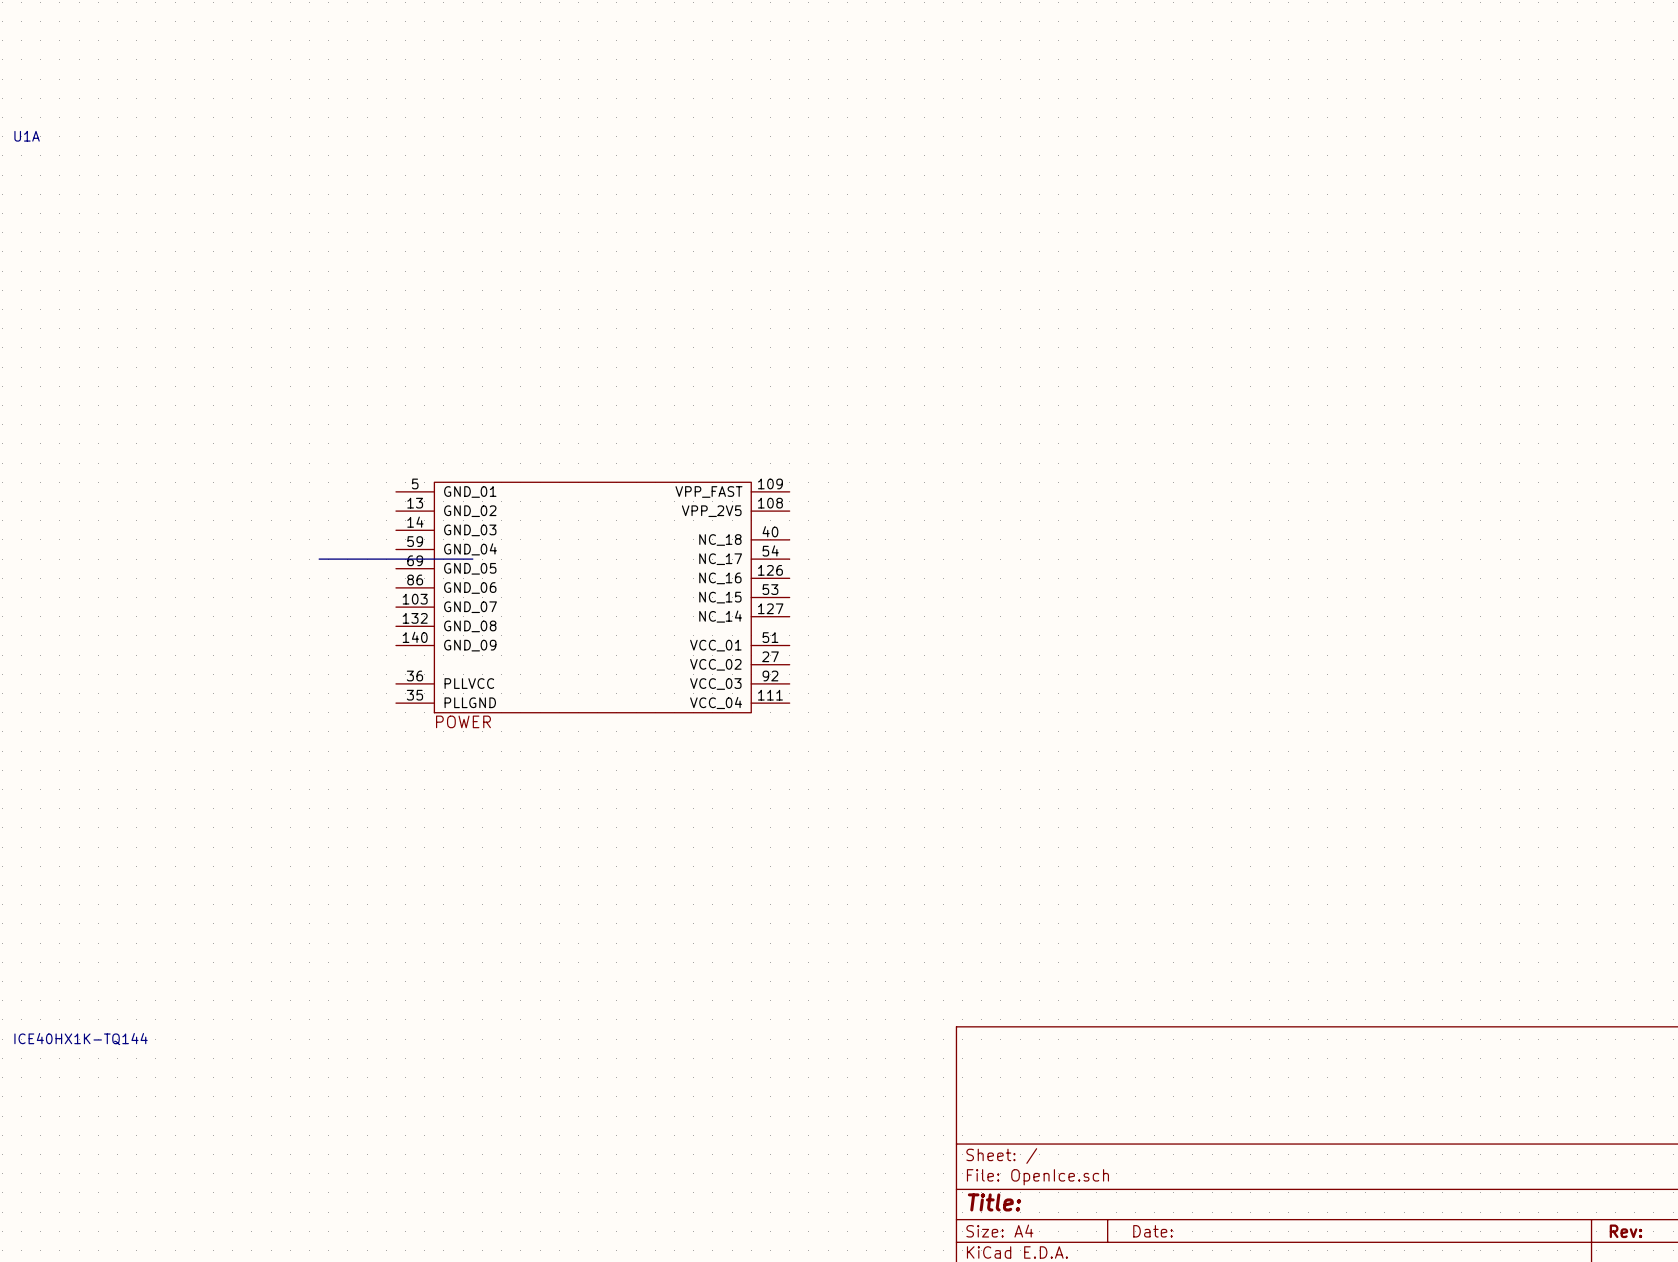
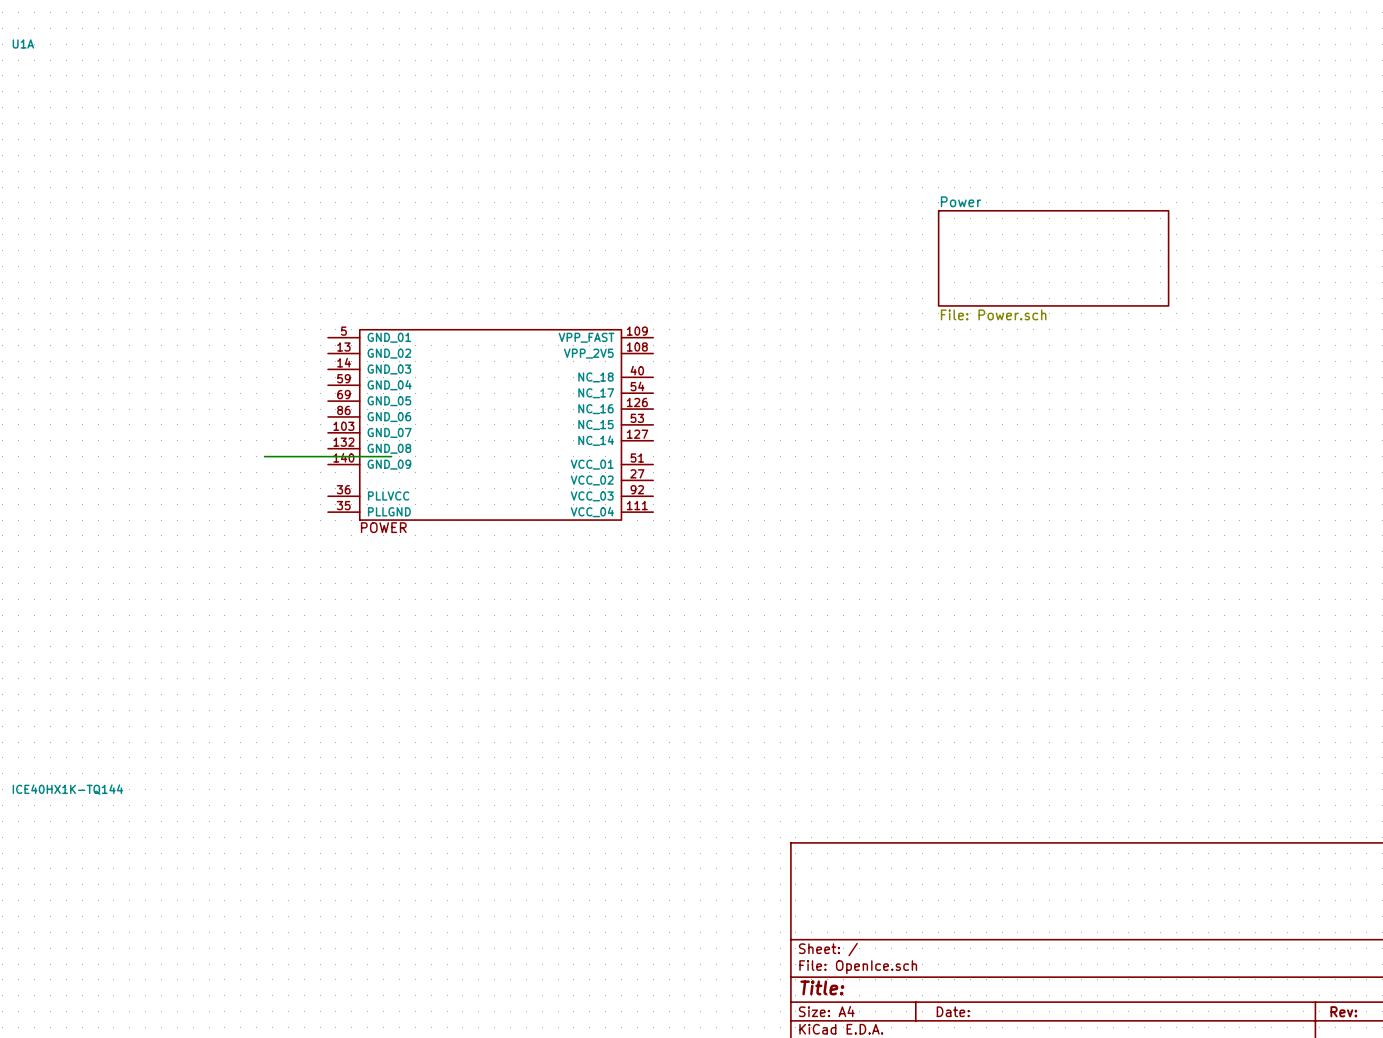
sheet Power: none -> File: Power.sch (1053, 258)
U1A position: (592, 597) -> (490, 424)

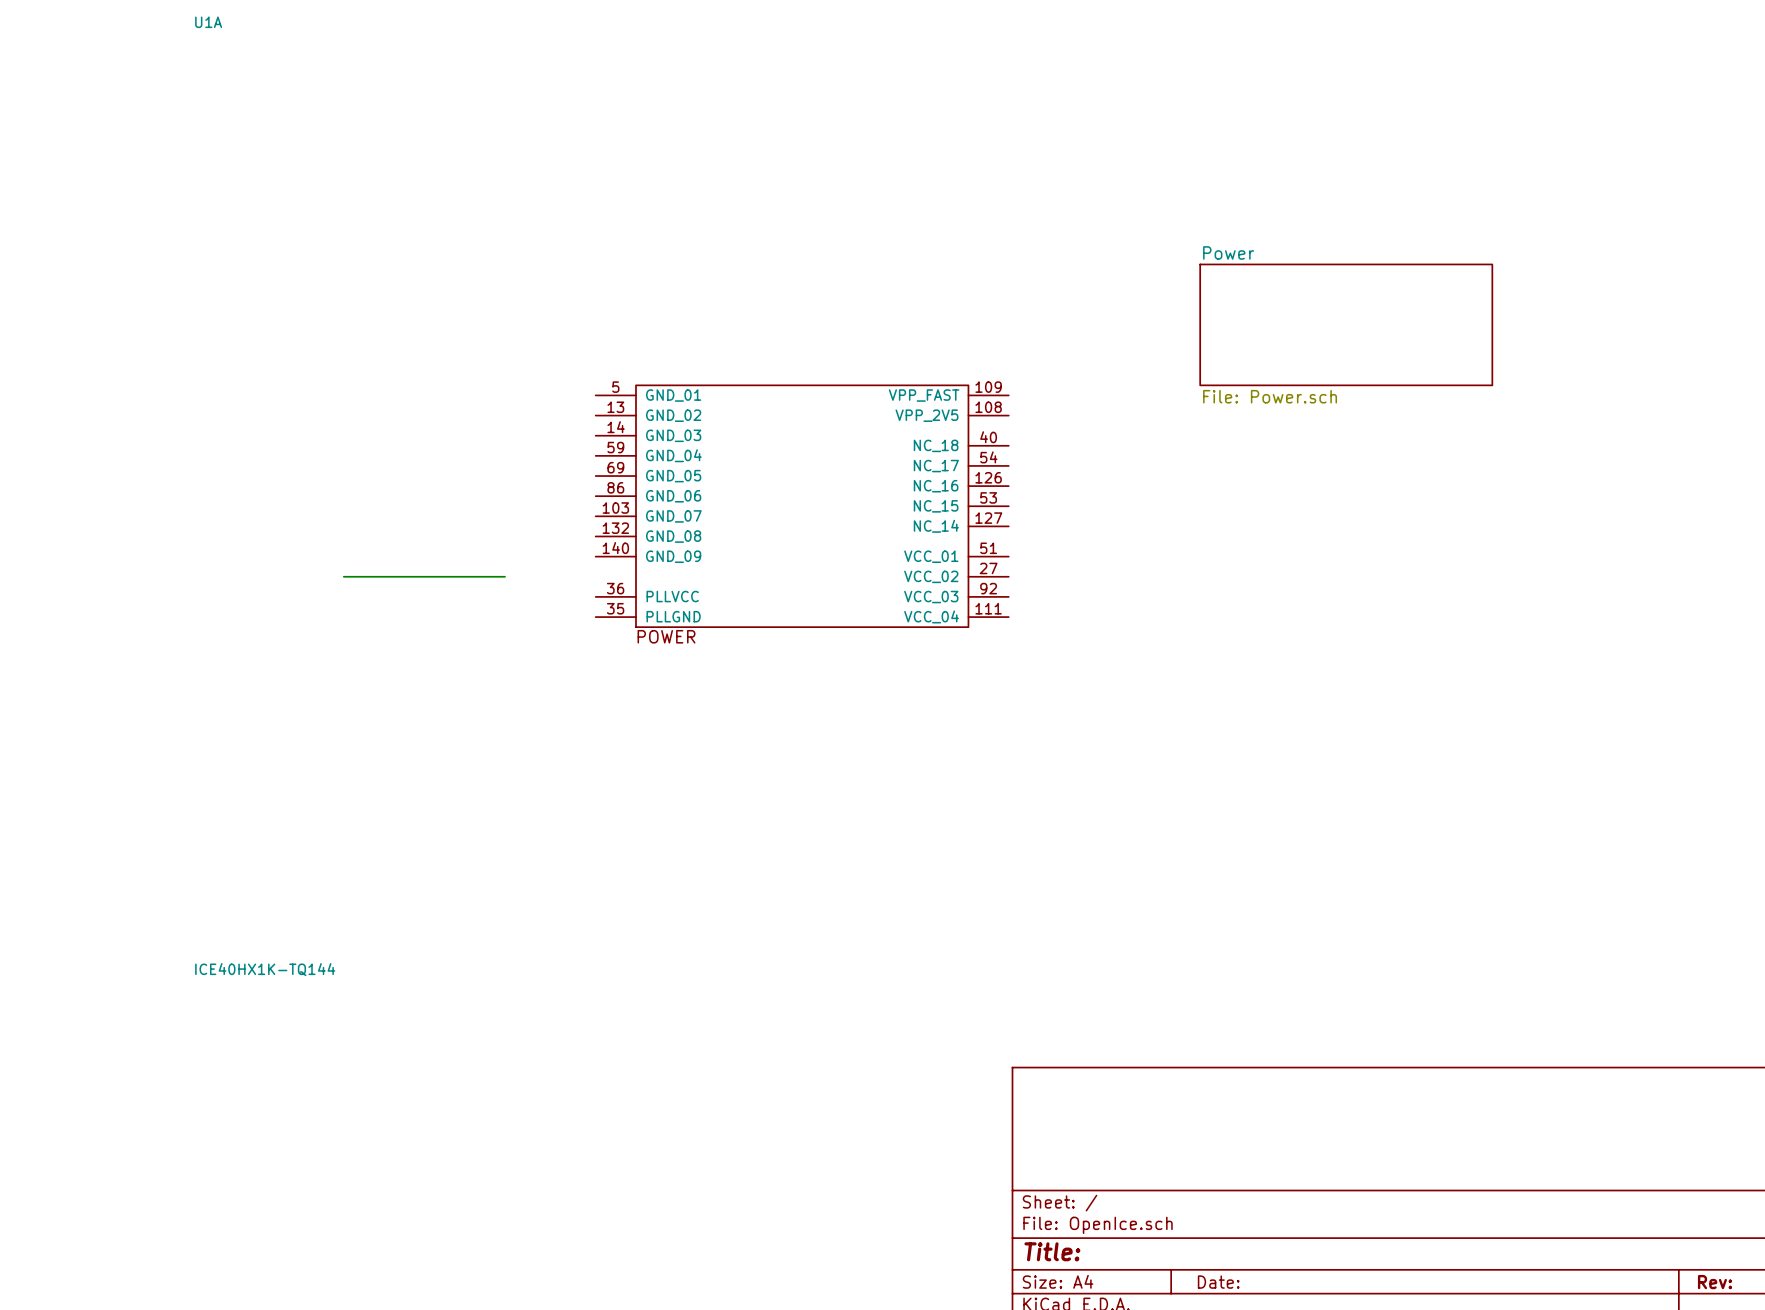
U1A position: (490, 424) -> (802, 506)

